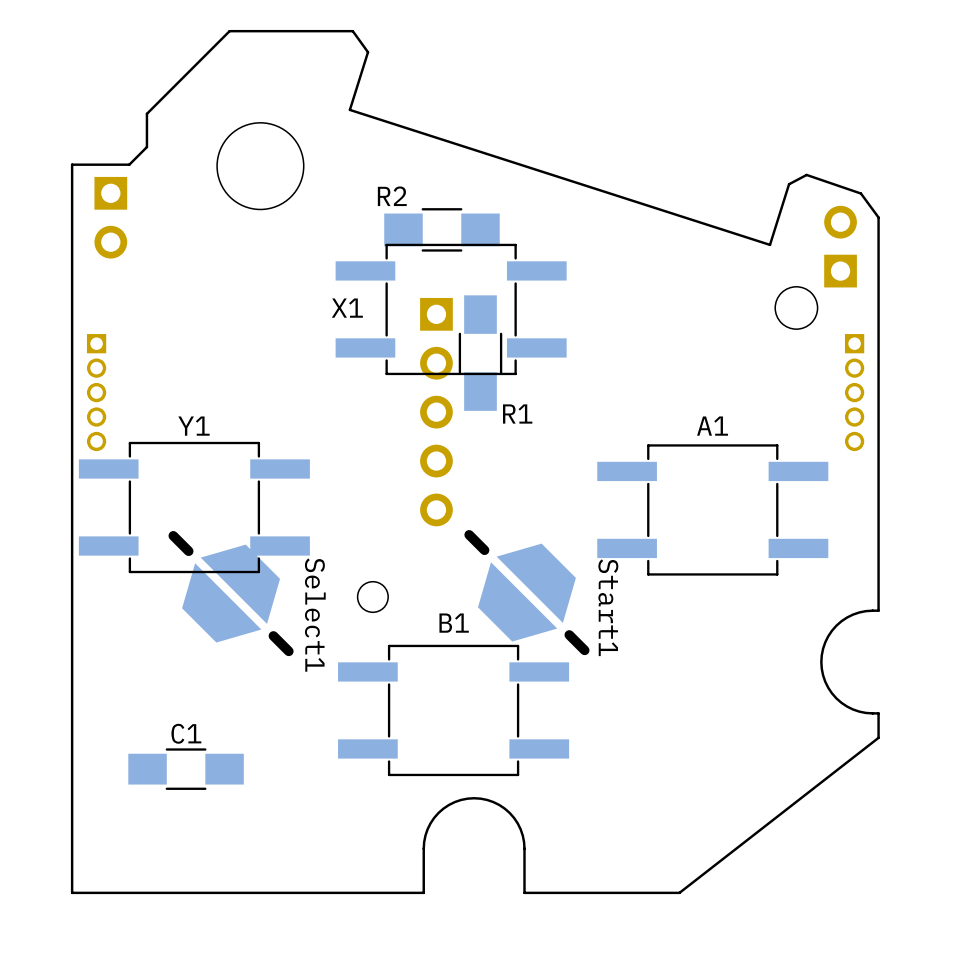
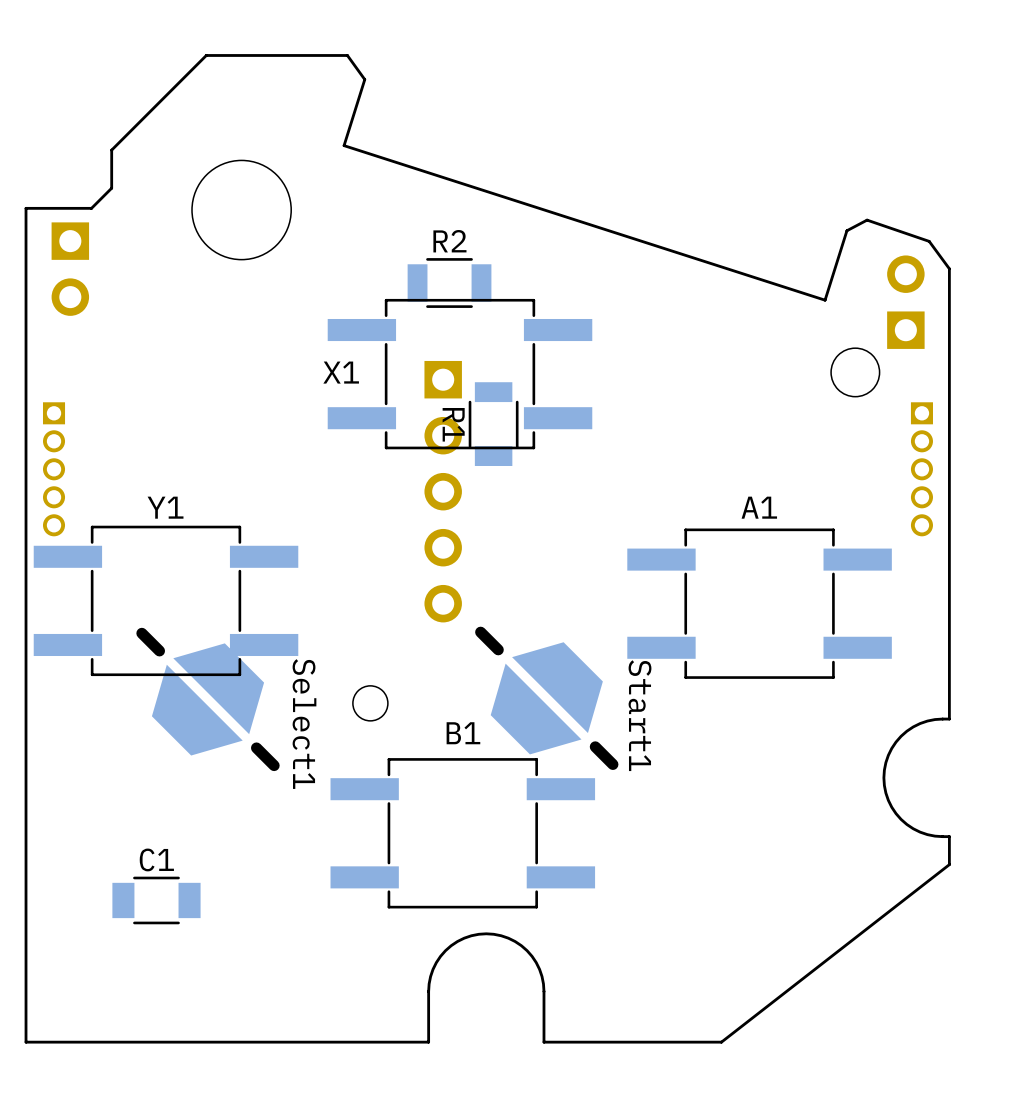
R2 name position: R2 (392, 196) -> R2 (449, 241)
R2 footprint: [384, 208, 500, 252] -> [407, 258, 492, 308]
R1 footprint: [458, 295, 503, 411] -> [468, 382, 519, 466]
R1 name position: R1 (517, 414) -> R1 (453, 424)
C1 footprint: [128, 748, 244, 790] -> [112, 876, 201, 925]

